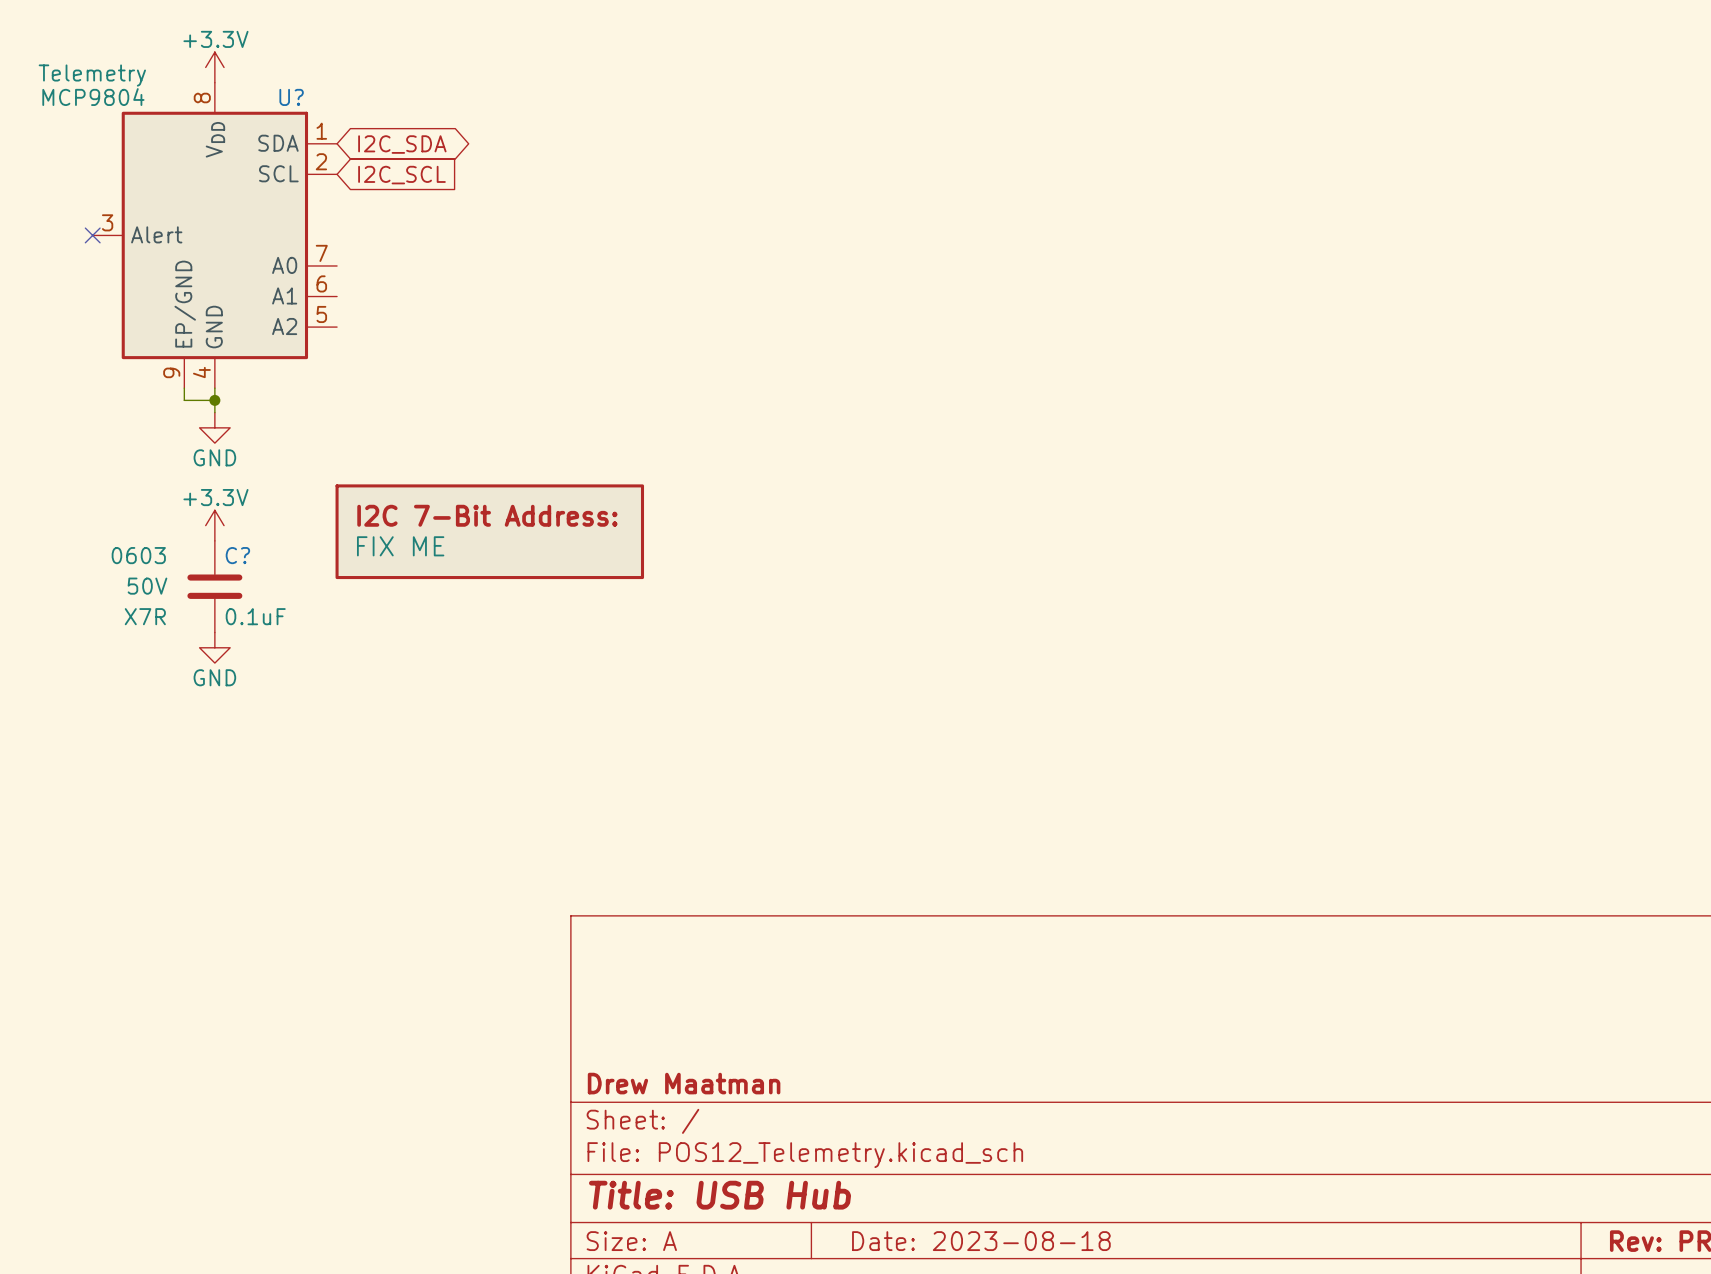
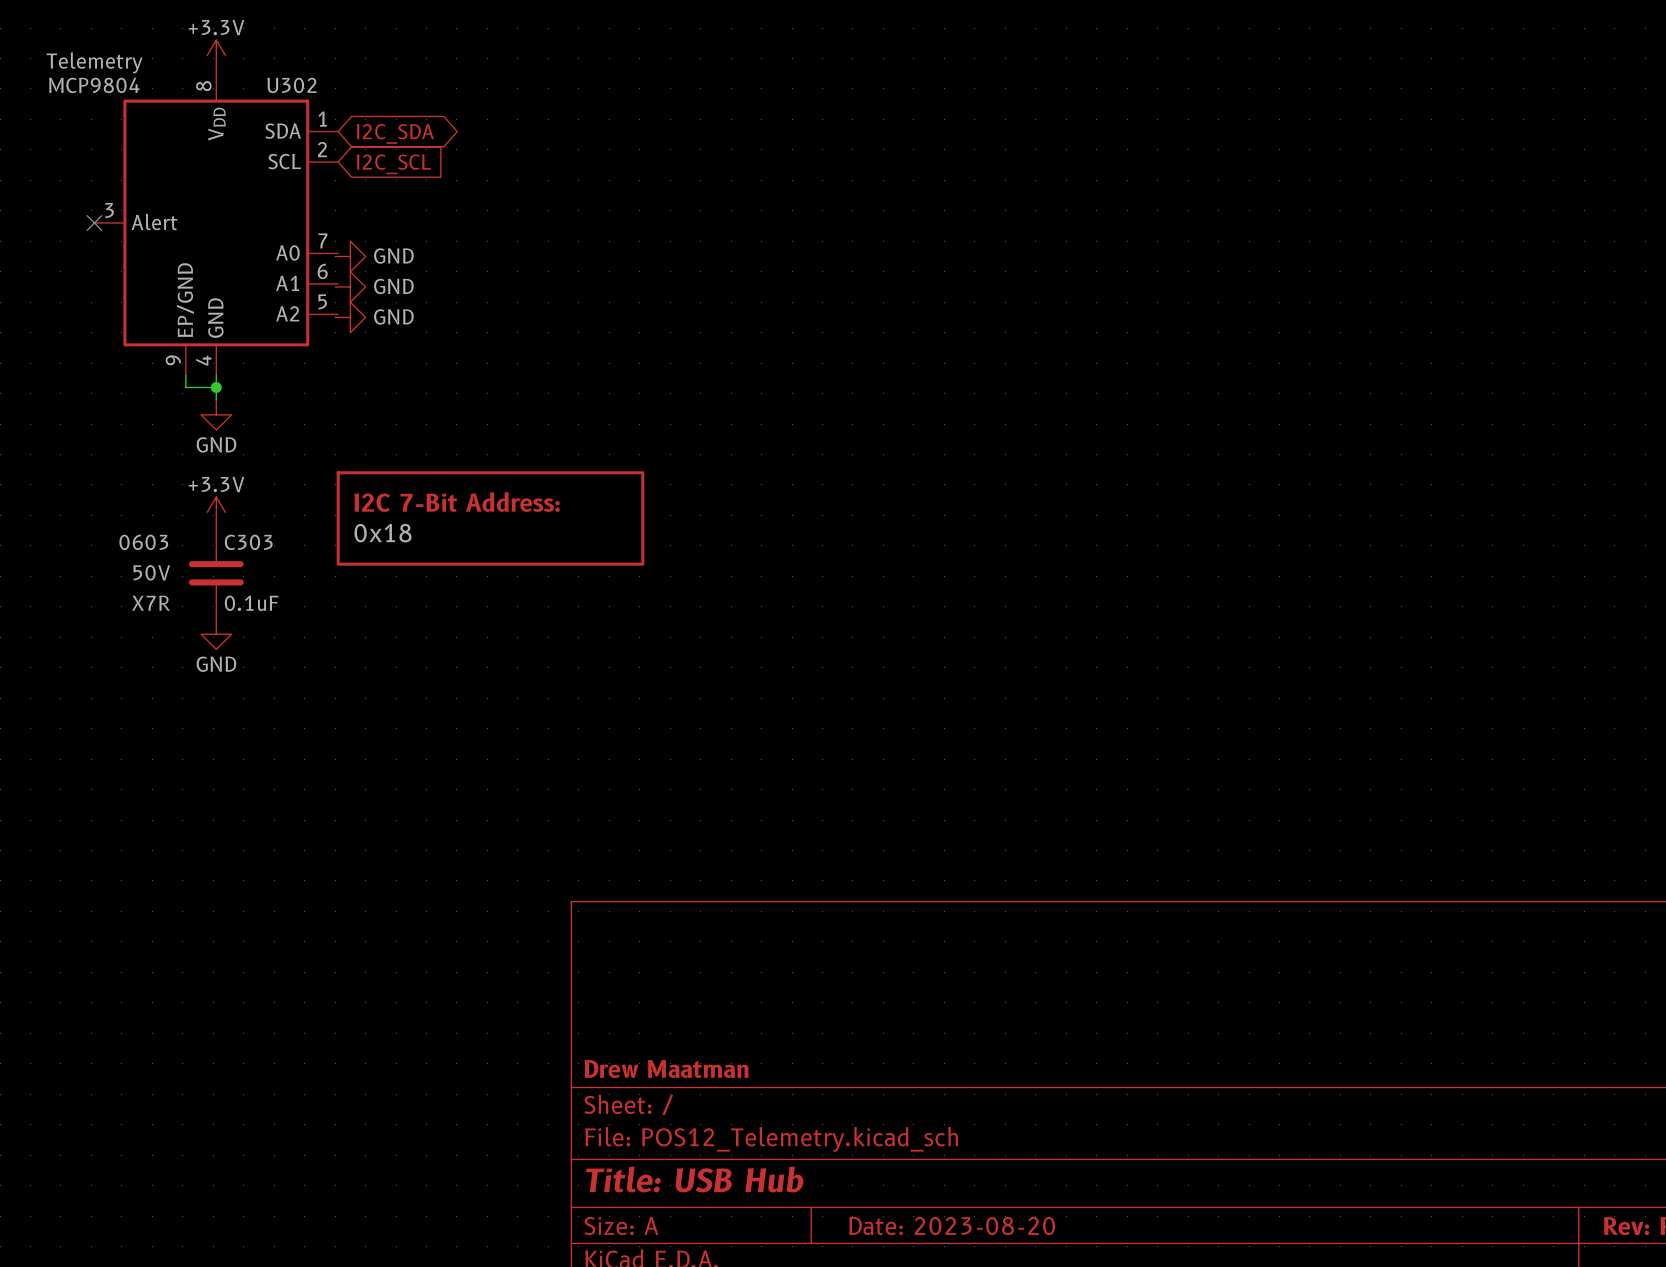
U? name: U? (291, 97) -> U302 (292, 85)
power symbol: none -> GND (350, 256)
power symbol: none -> GND (350, 286)
power symbol: none -> GND (350, 317)
part value: FIX ME (400, 546) -> 0x18 (382, 533)
C? name: C? (237, 555) -> C303 (248, 542)
title block: Date: 2023-08-18 (981, 1241) -> Date: 2023-08-20 (952, 1226)

